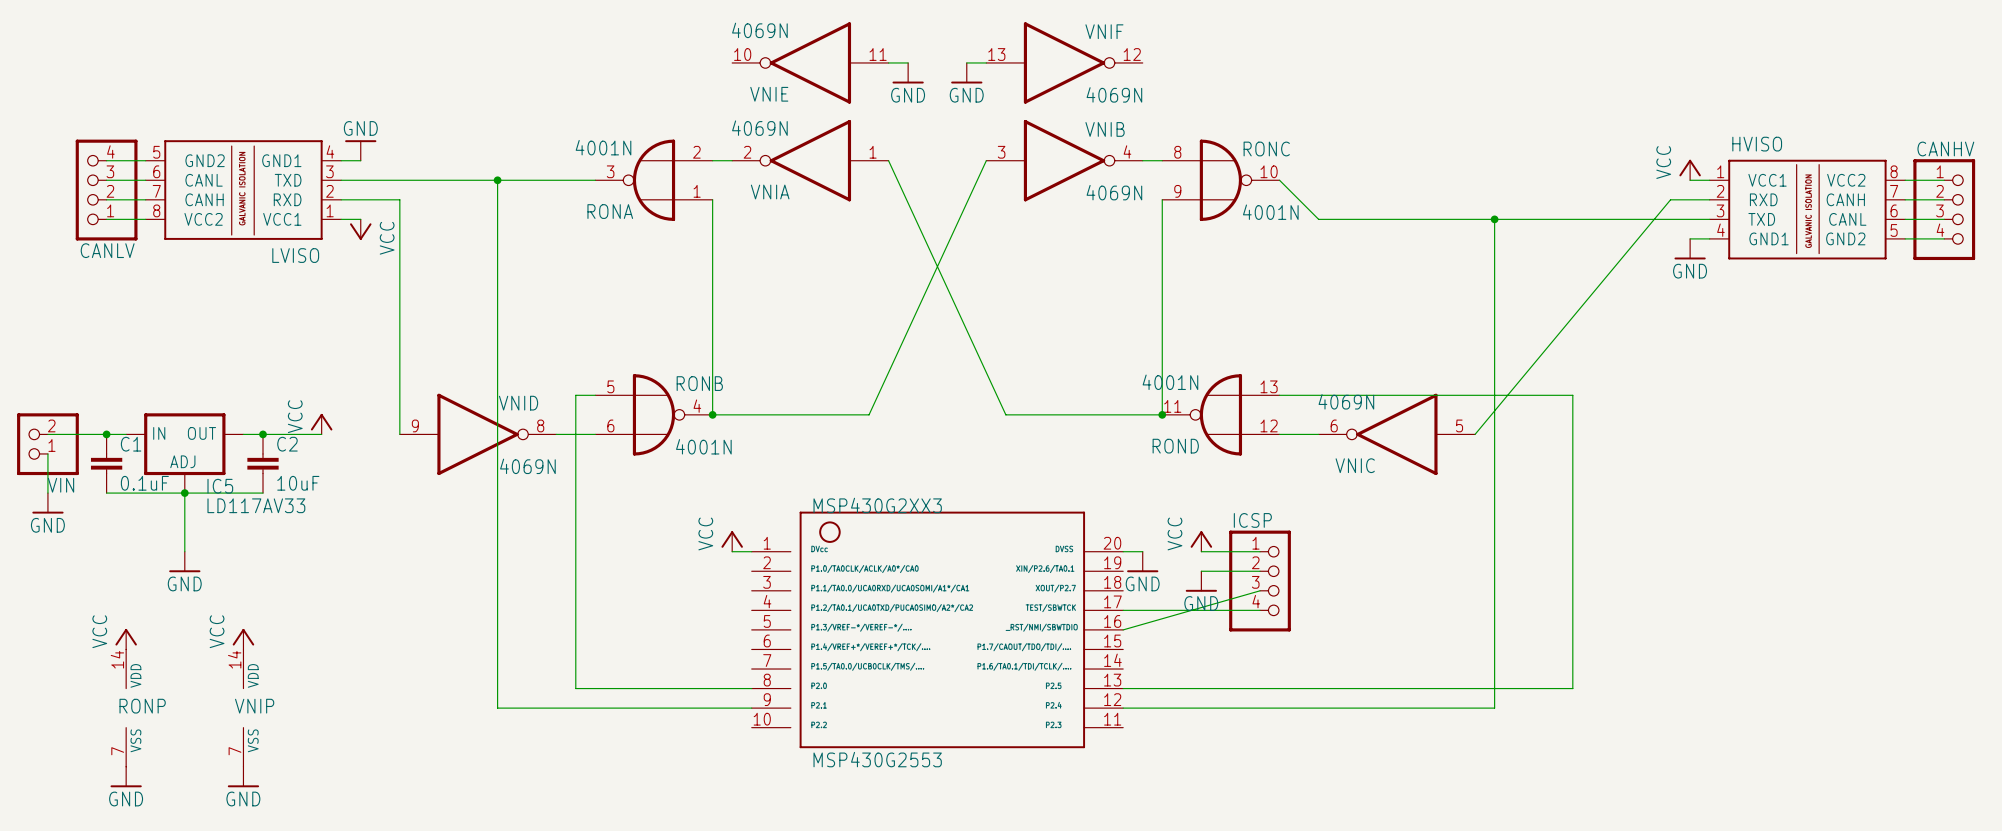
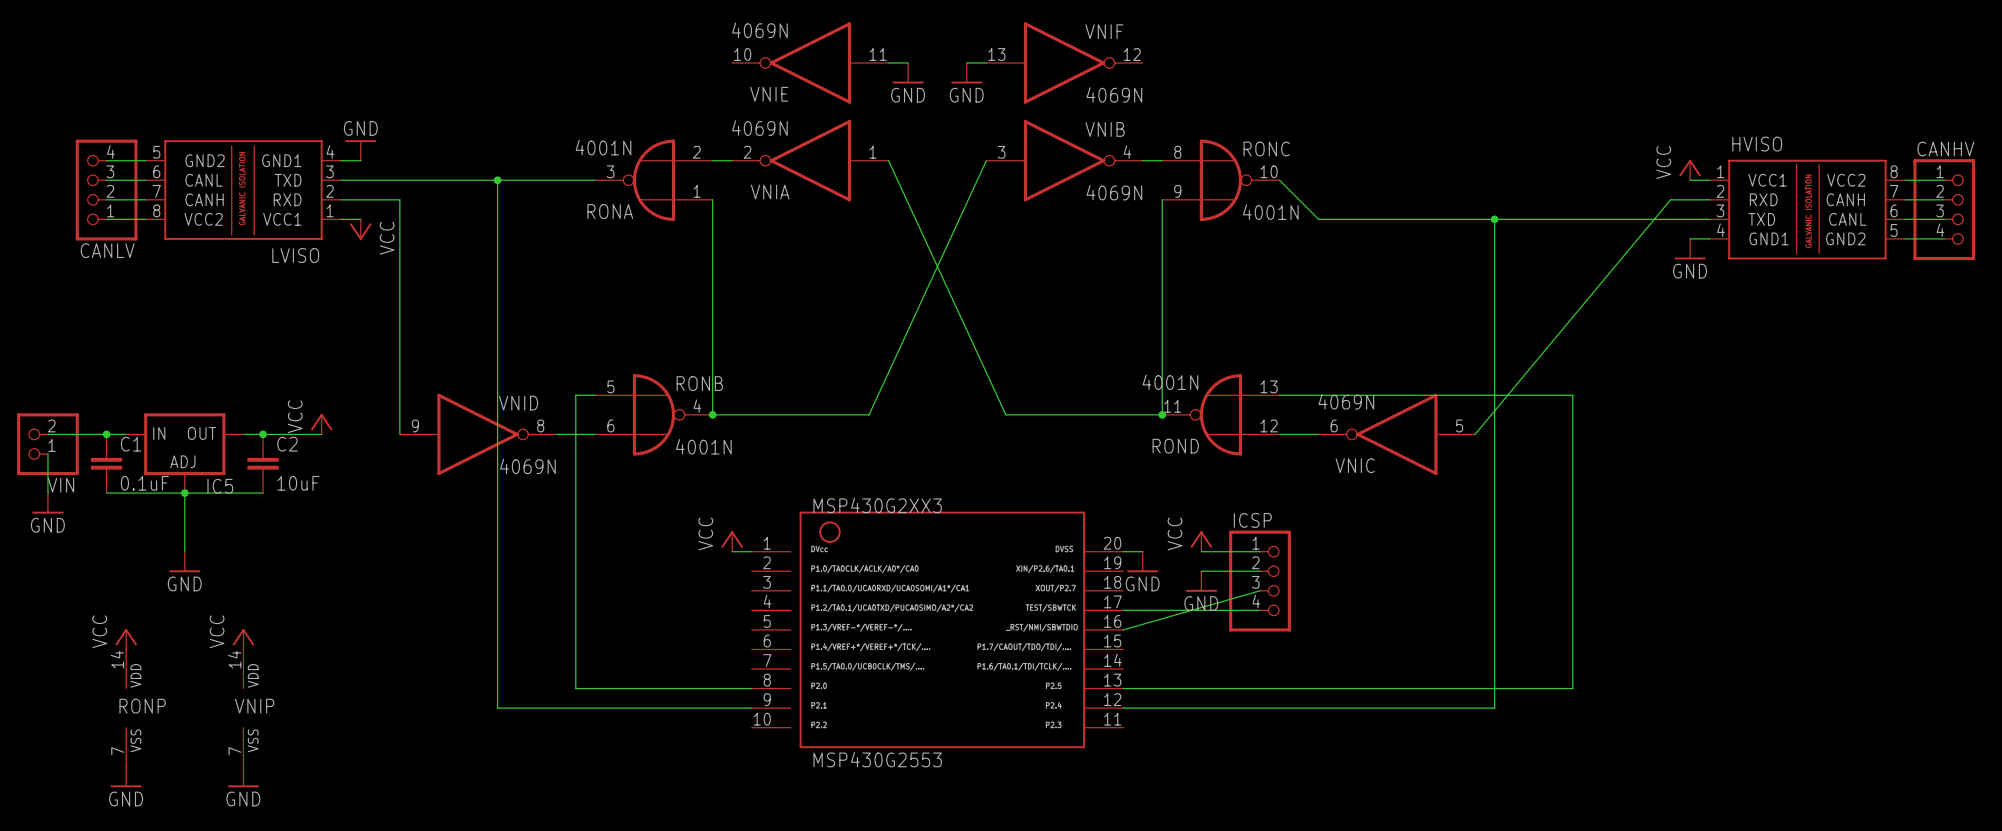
IC5 value: LD117AV33 (256, 505) -> none

